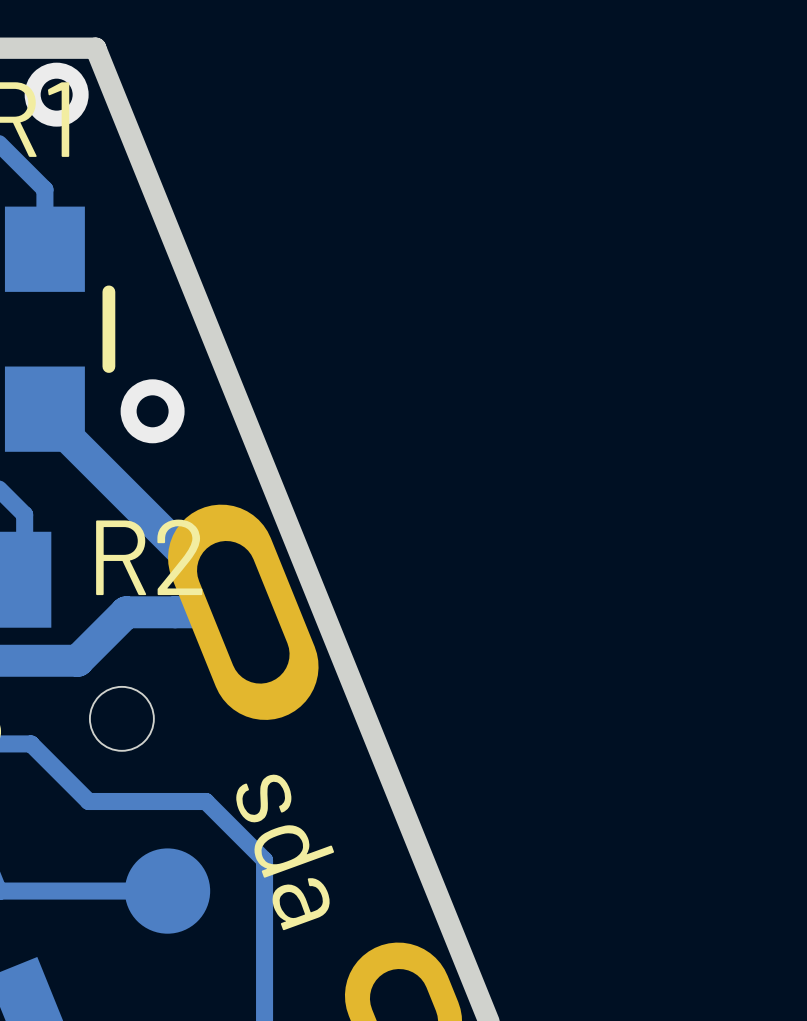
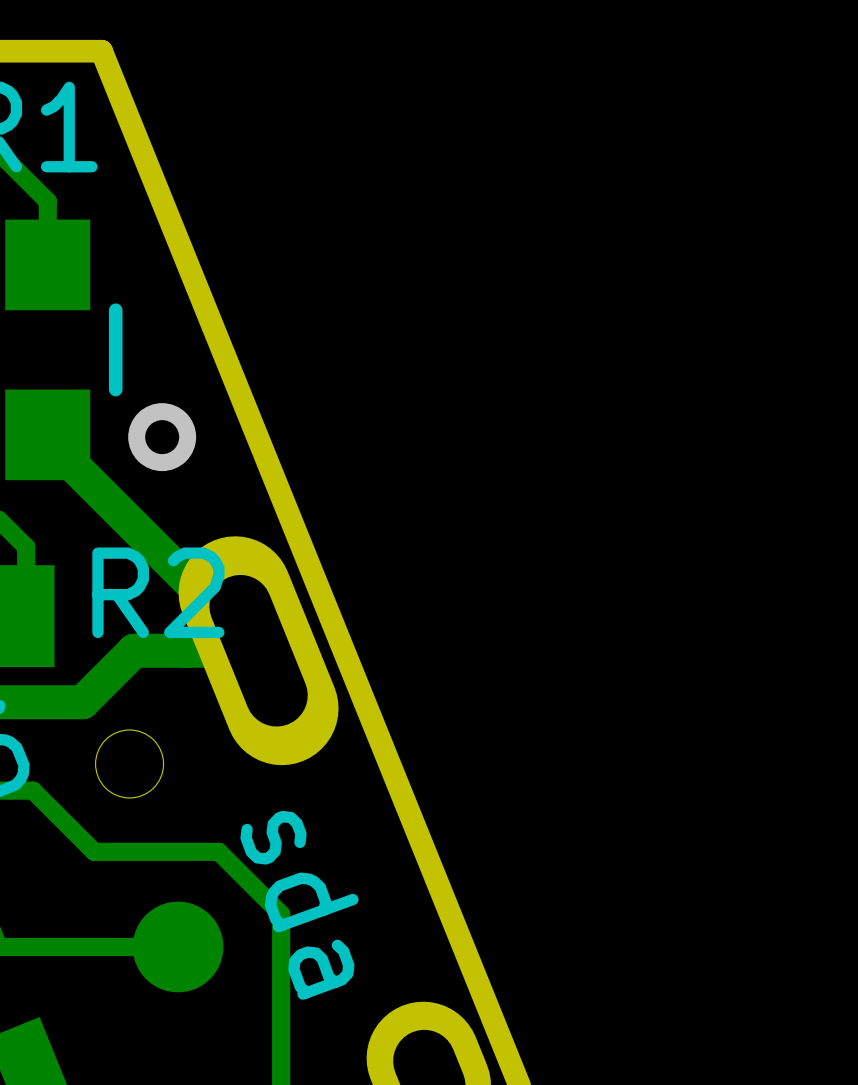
via: (56, 94) -> none

